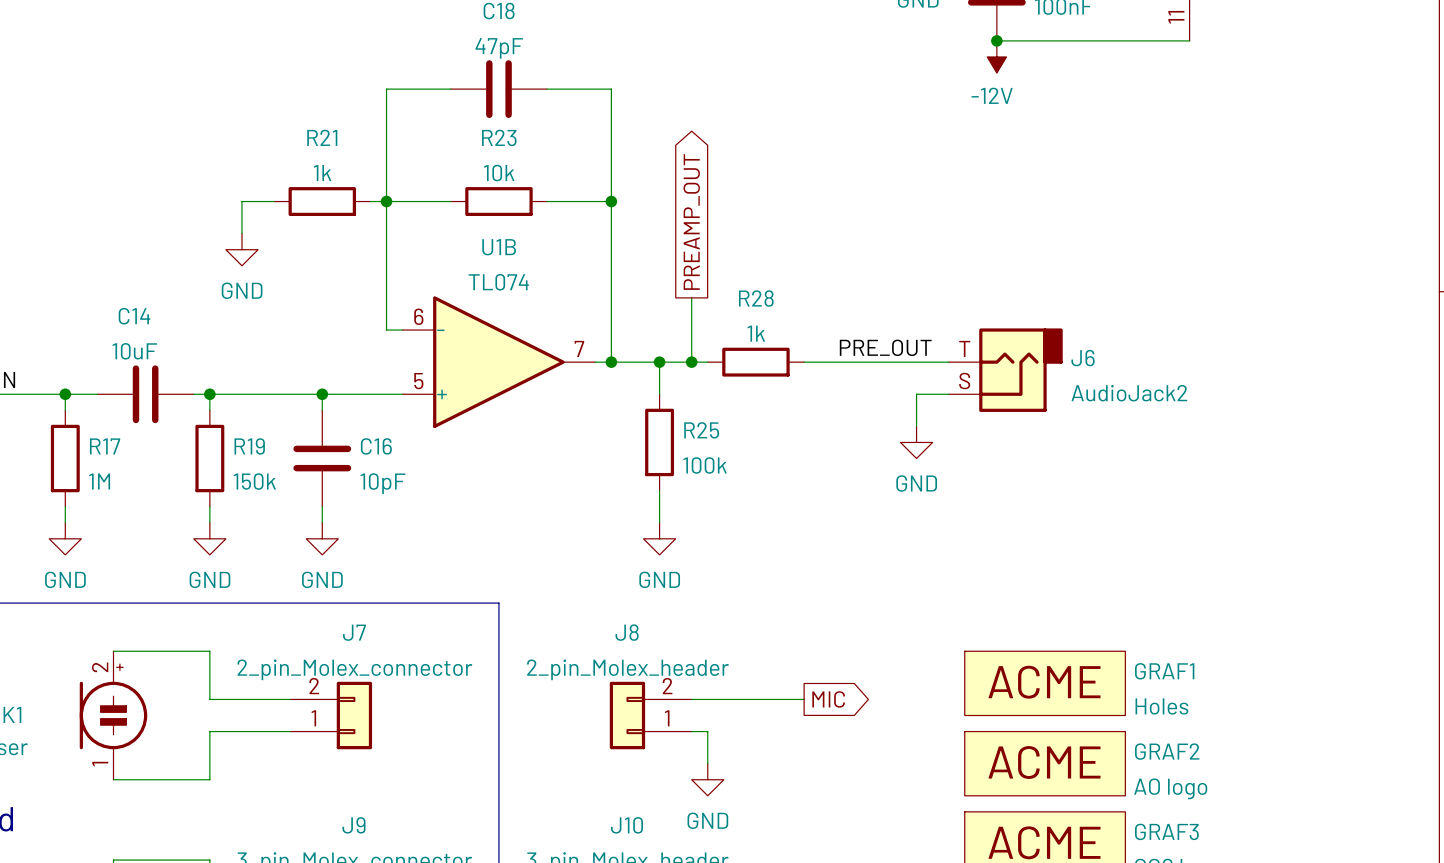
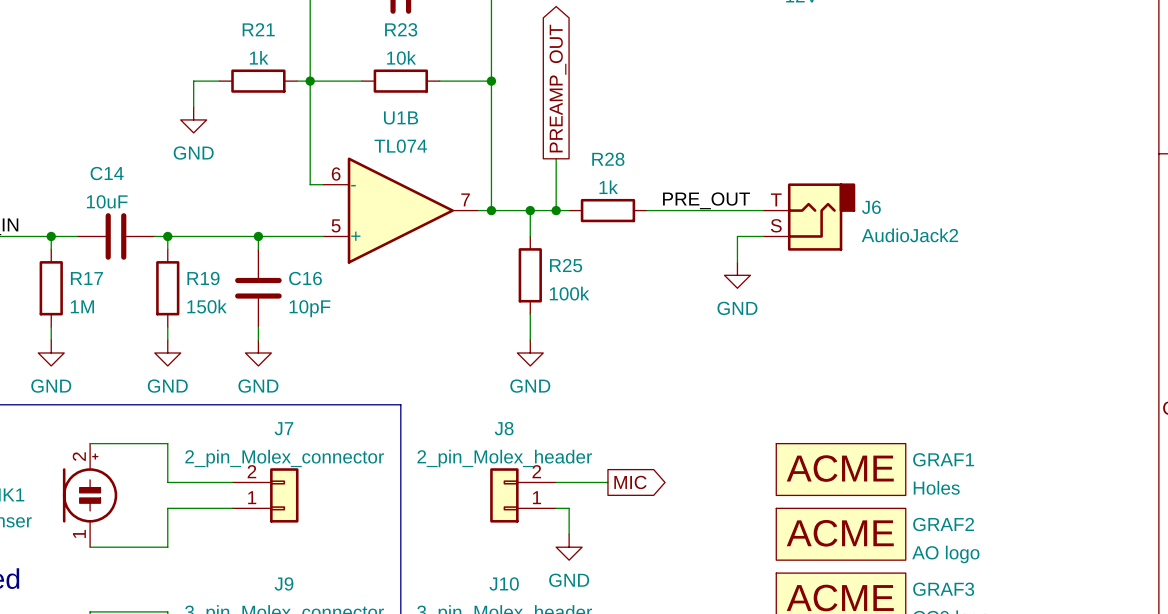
wire: (755, 699) (804, 699) -> none
global label position: MIC (828, 699) -> MIC (630, 482)

